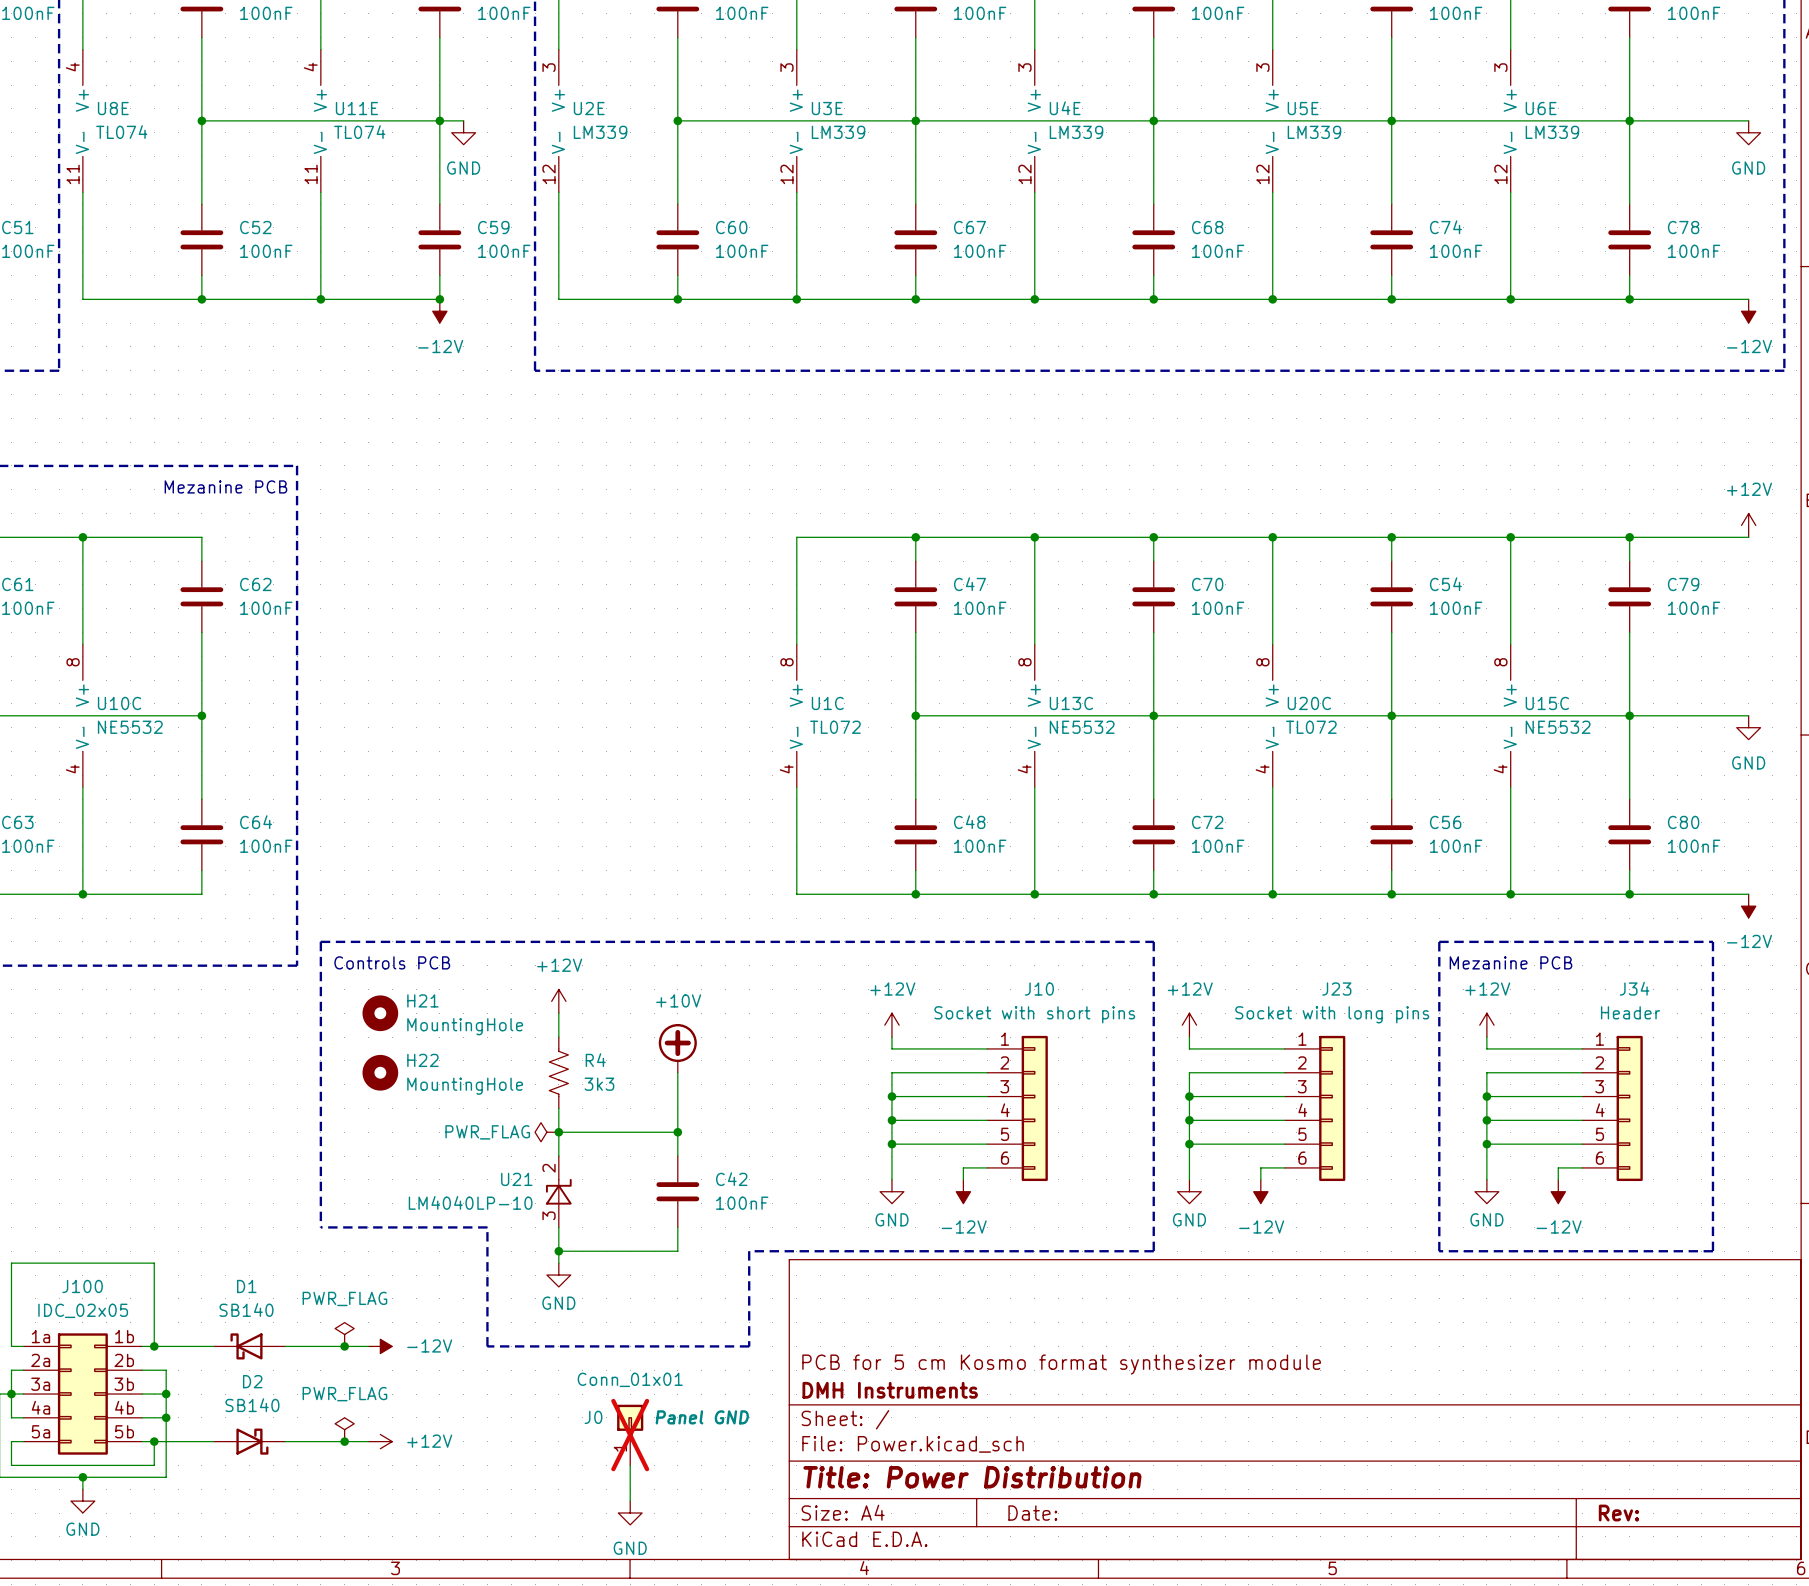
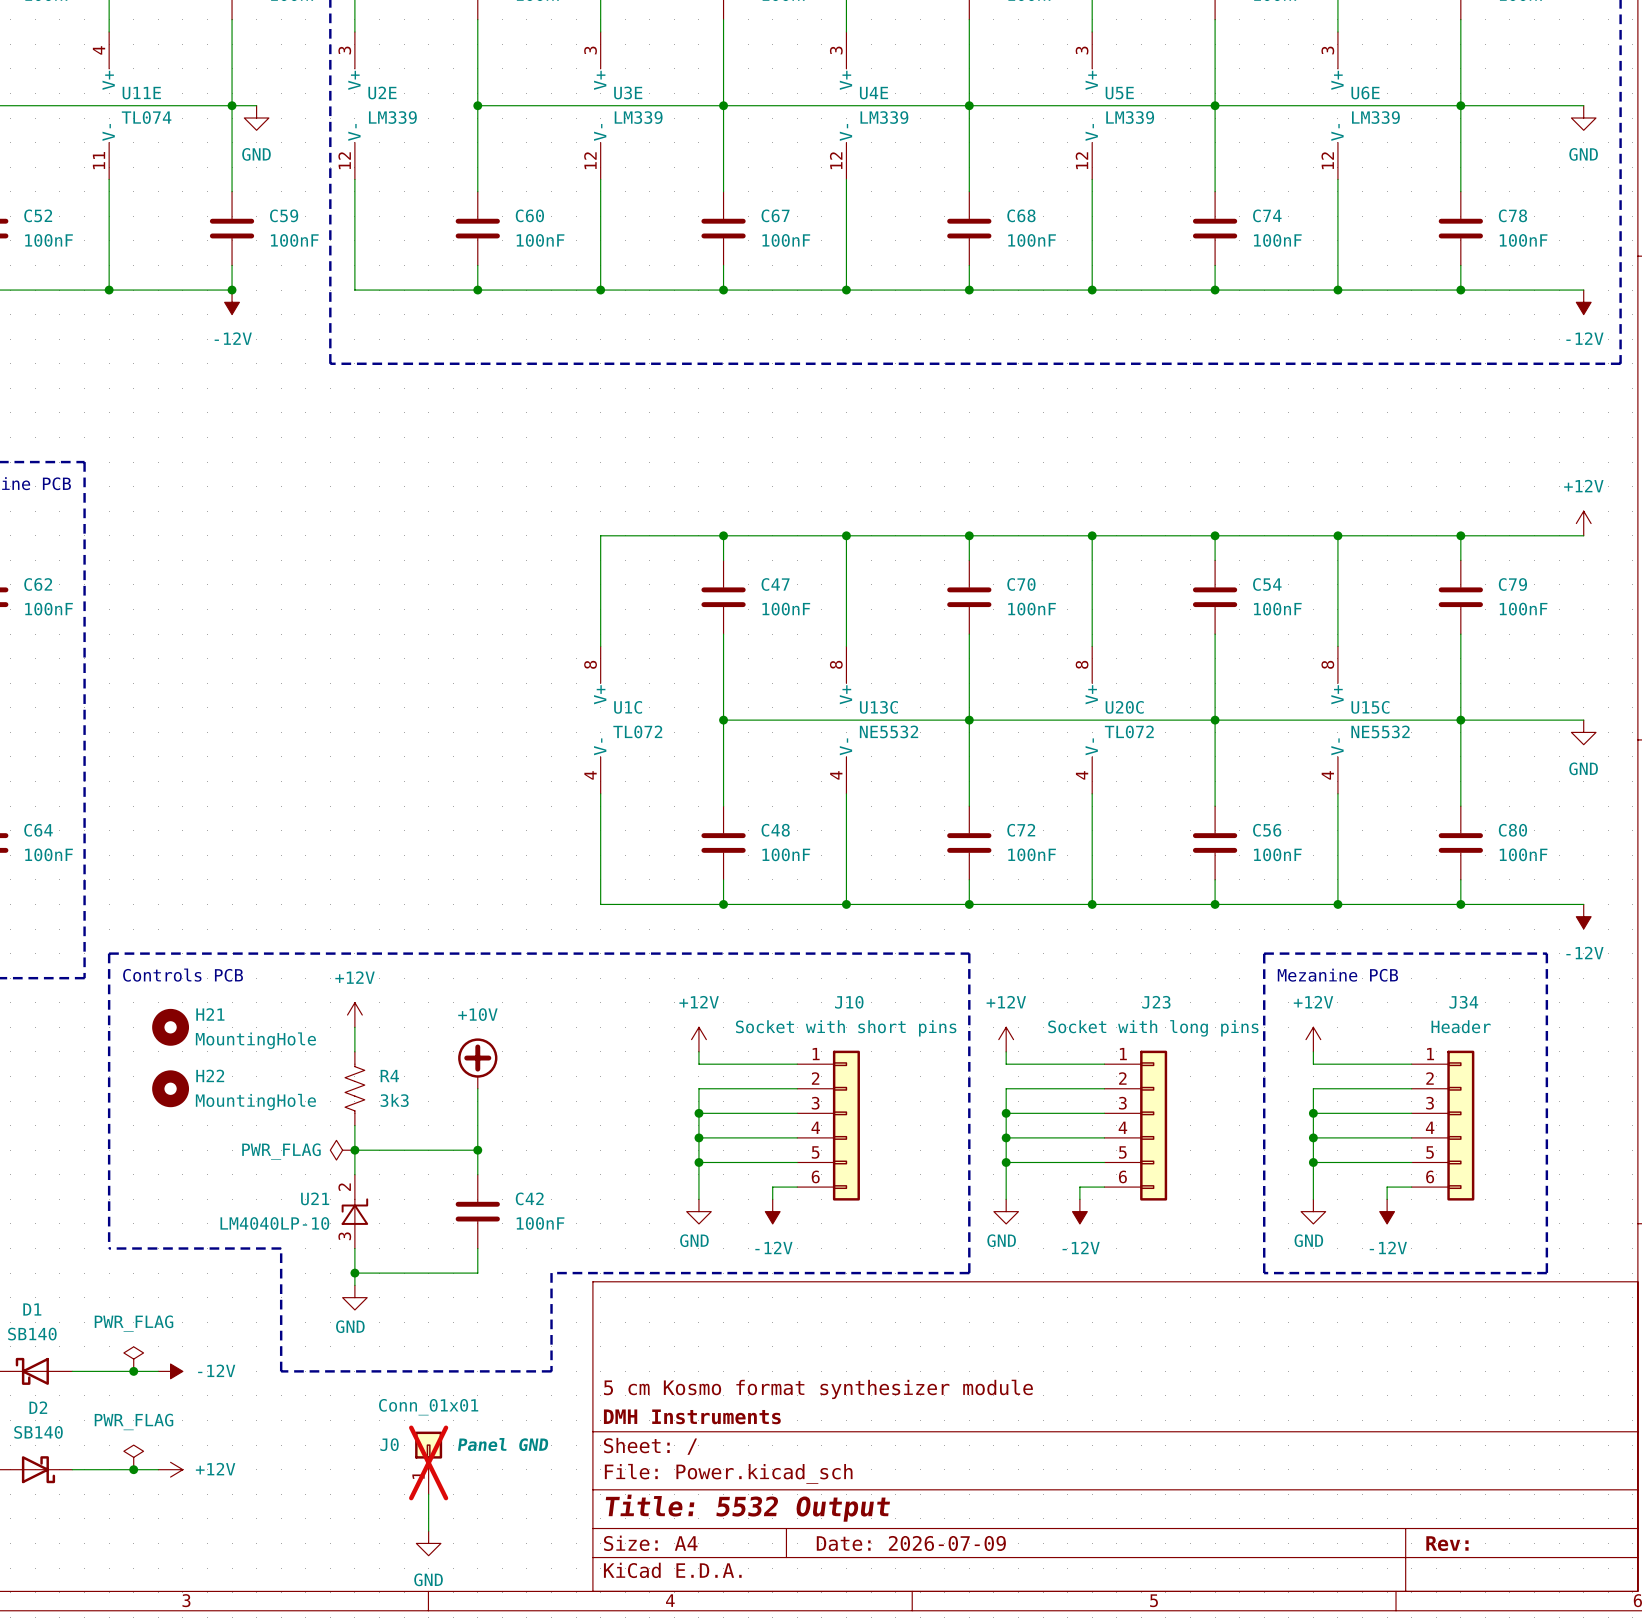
title block: PCB for 5 cm Kosmo format synthesizer module (1061, 1364) -> 5 cm Kosmo format synthesizer module (818, 1389)
title block: Title: Power Distribution (972, 1477) -> Title: 5532 Output (747, 1508)
title block: Date: (1032, 1513) -> Date: 2026-07-09 (911, 1543)

